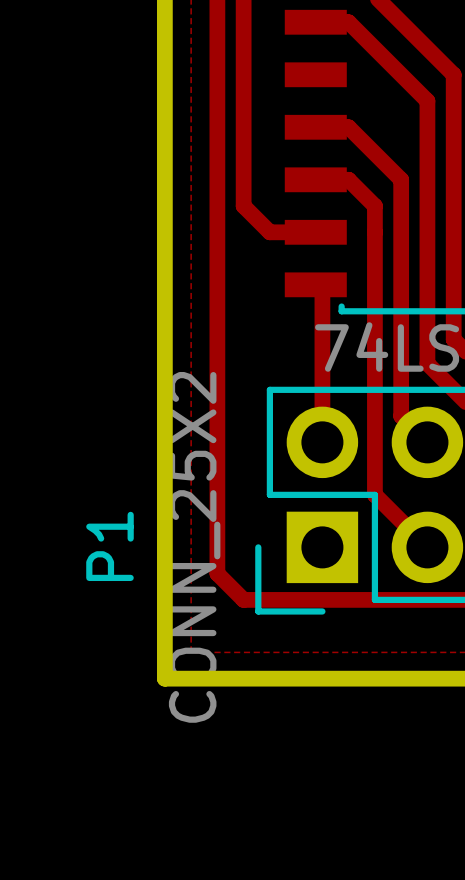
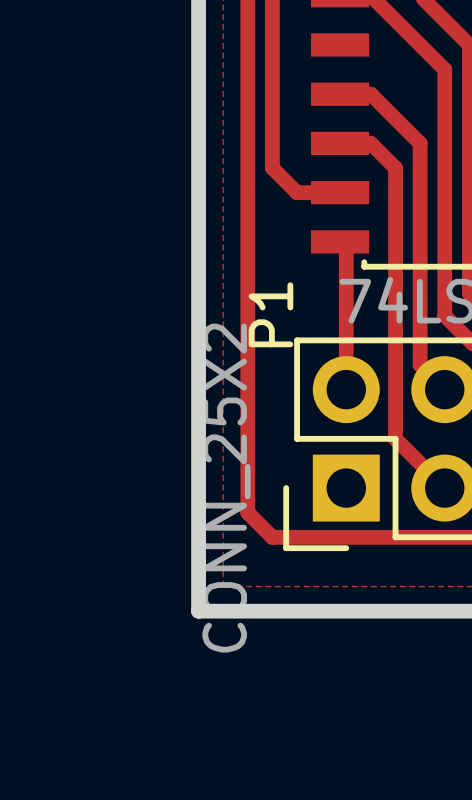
P1 name position: P1 (109, 546) -> P1 (270, 314)

